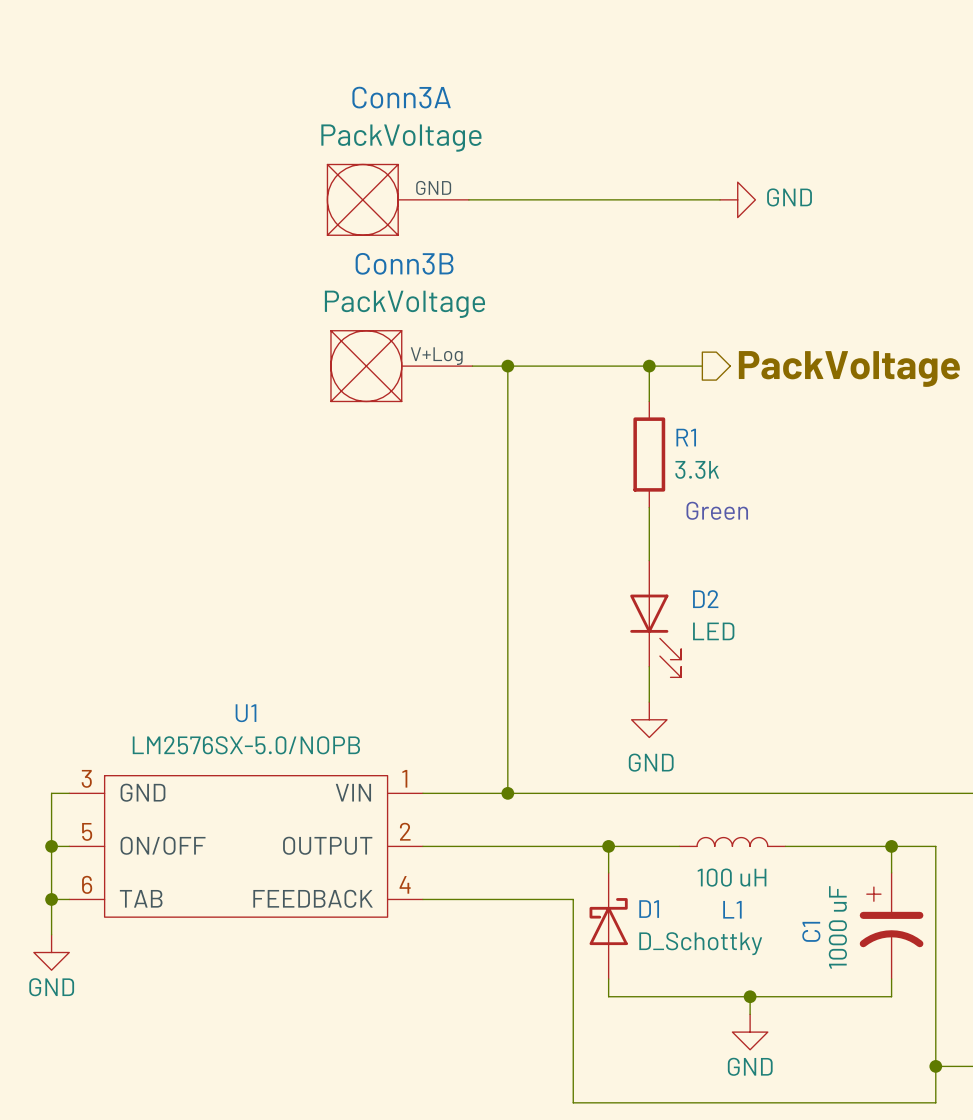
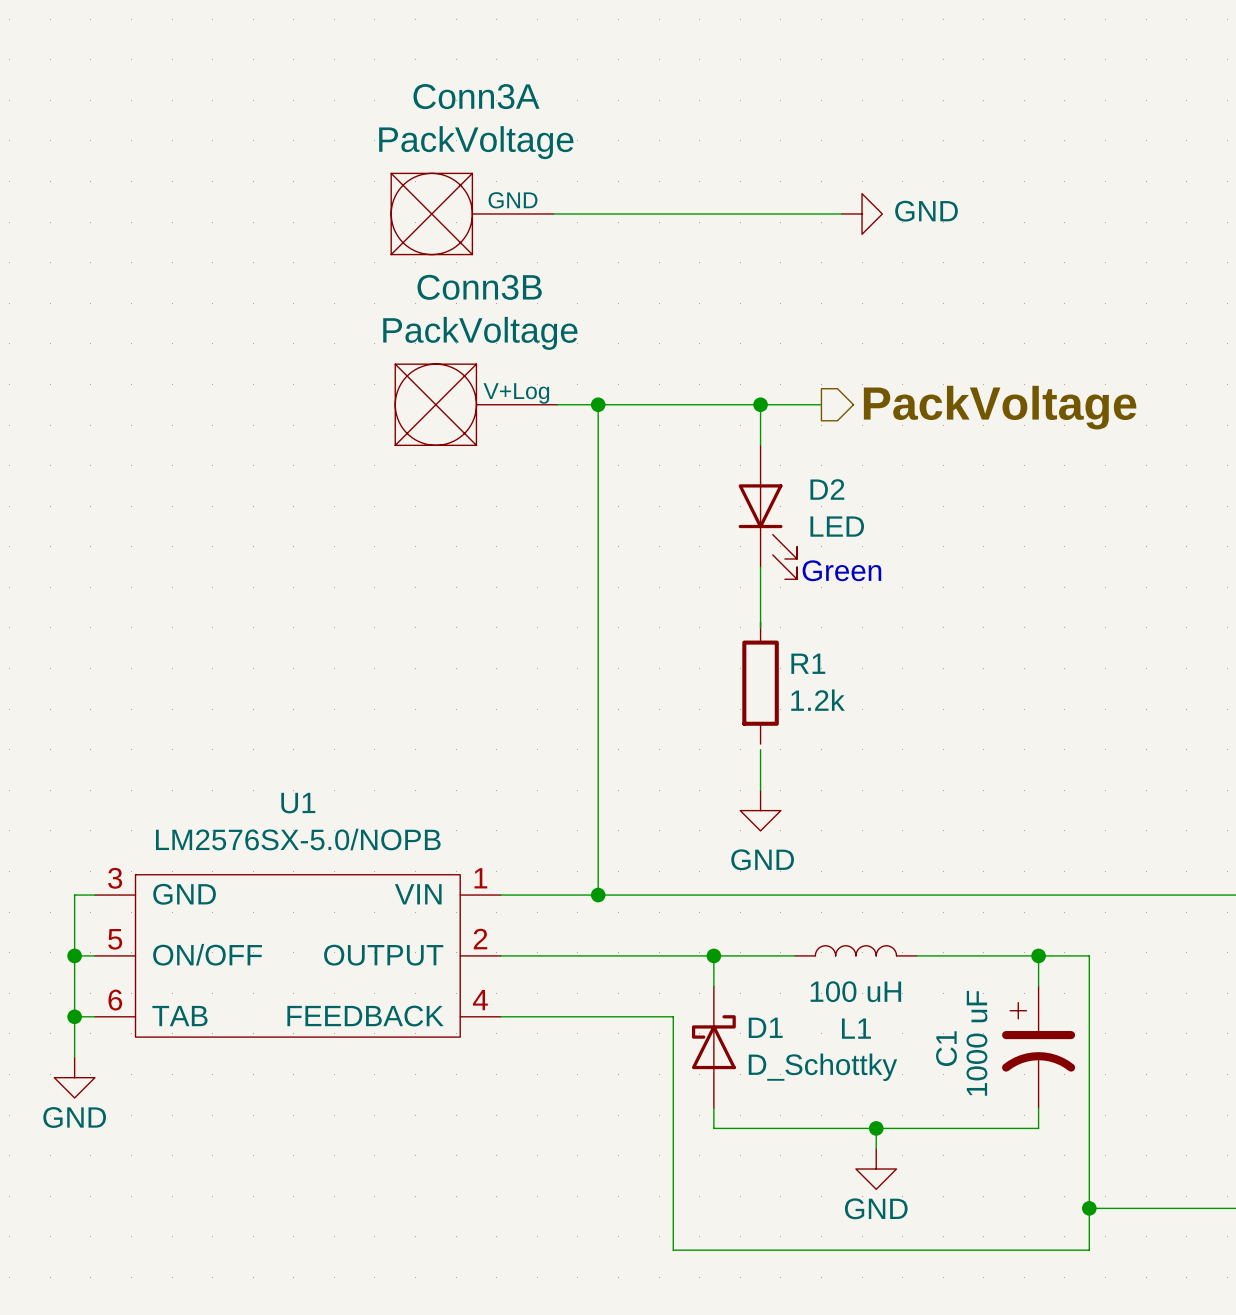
R1 position: (649, 454) -> (760, 683)
R1 value: 3.3k (697, 469) -> 1.2k (817, 700)
D2 position: (655, 618) -> (767, 512)

